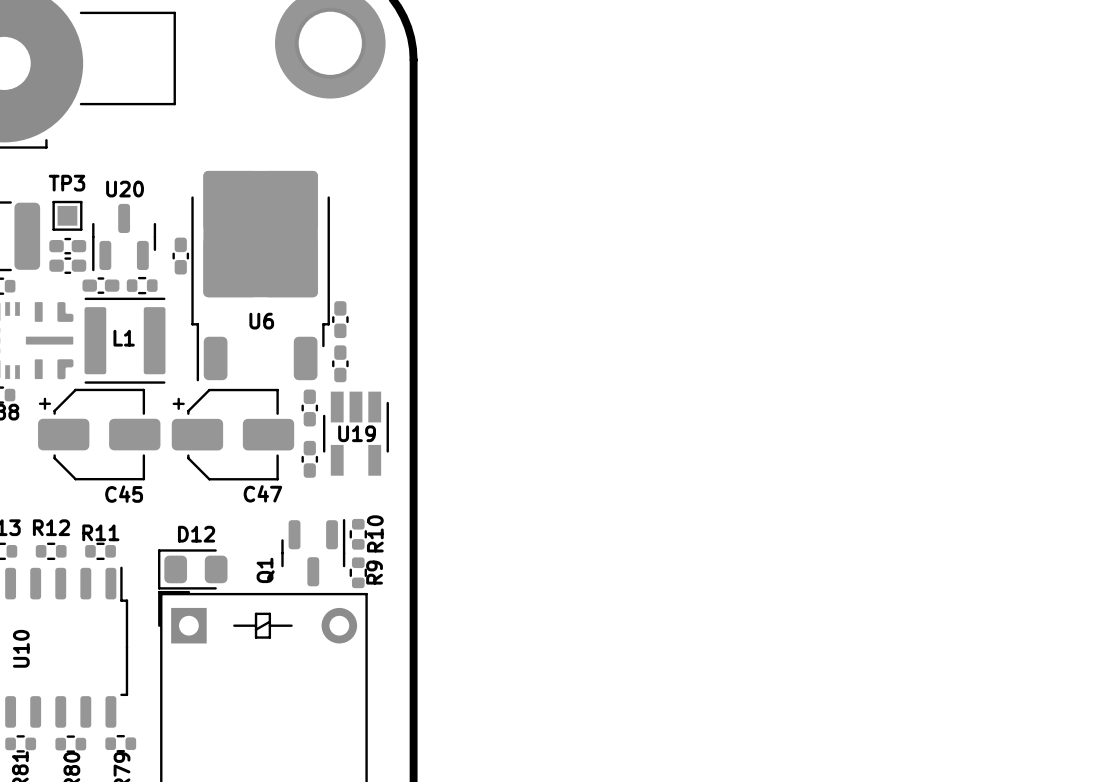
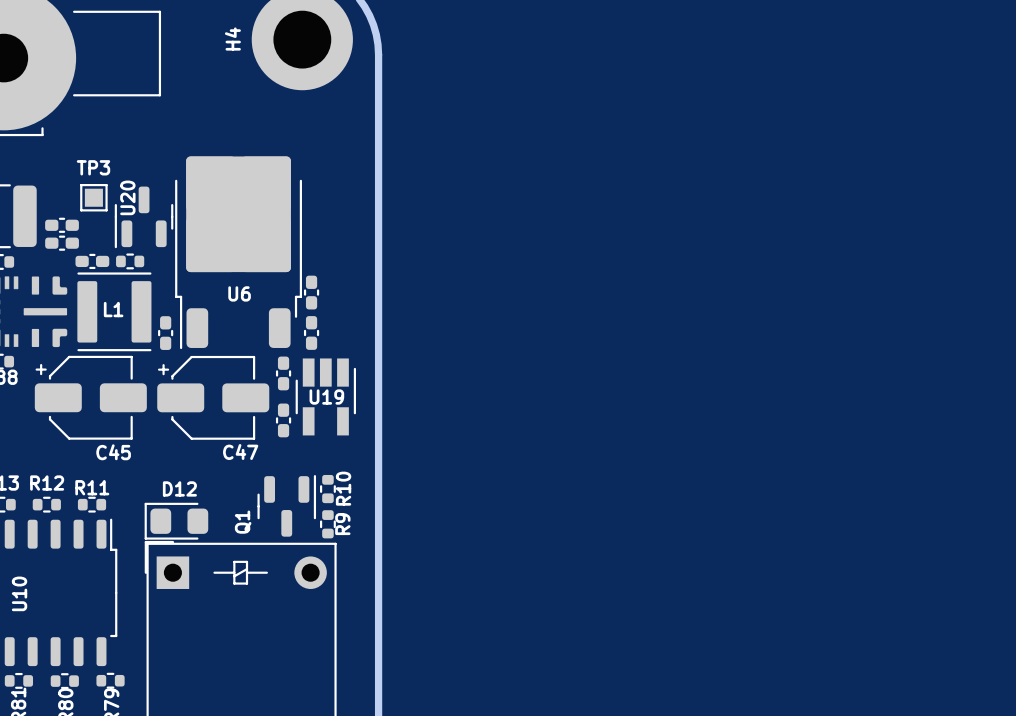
H4 name: none -> H4 (232, 39)
U20 name rotation: 0° (125, 189) -> 90° counterclockwise (127, 197)
TP3 position: (67, 215) -> (93, 197)
U20 position: (124, 237) -> (144, 217)
part position: (180, 256) -> (165, 333)

